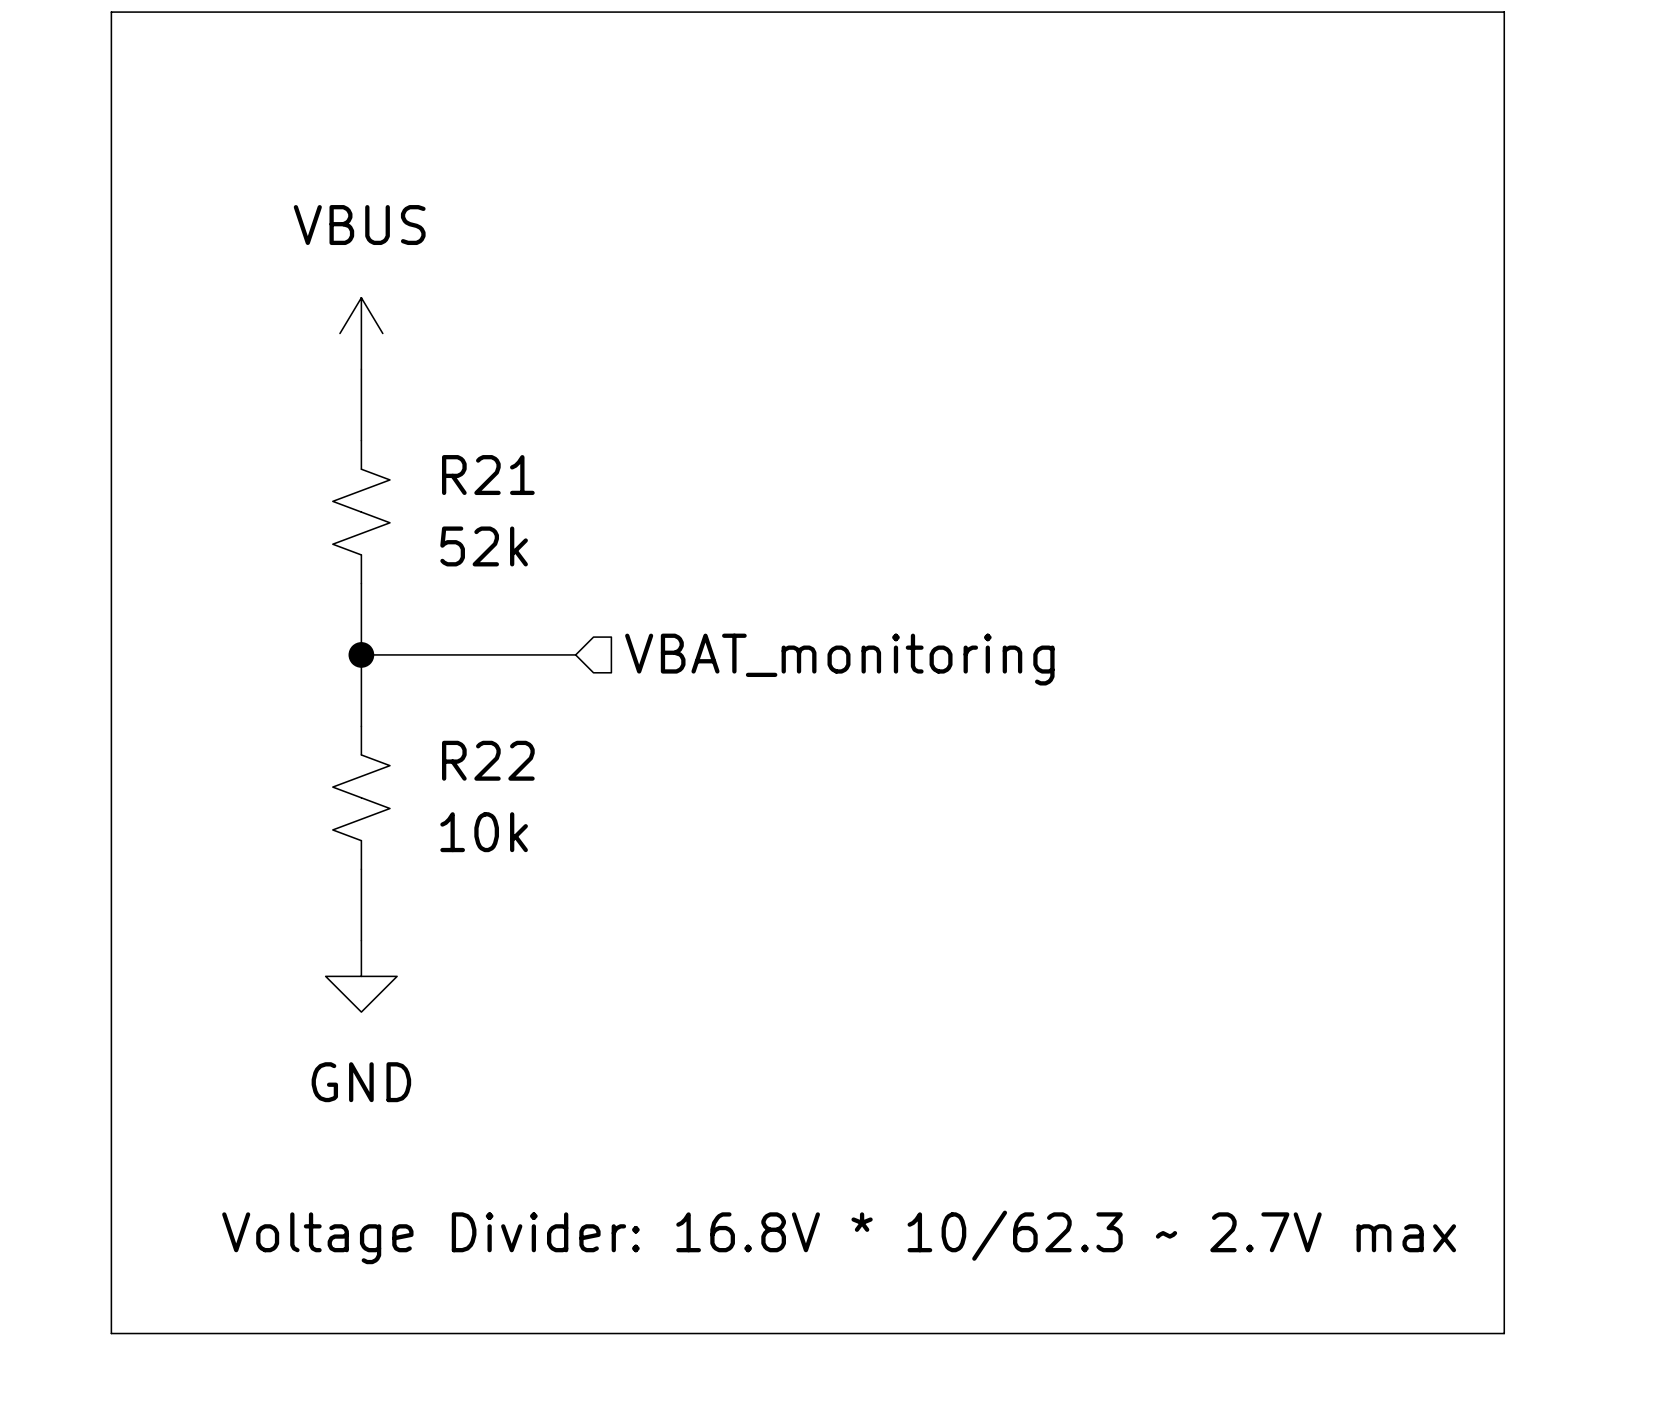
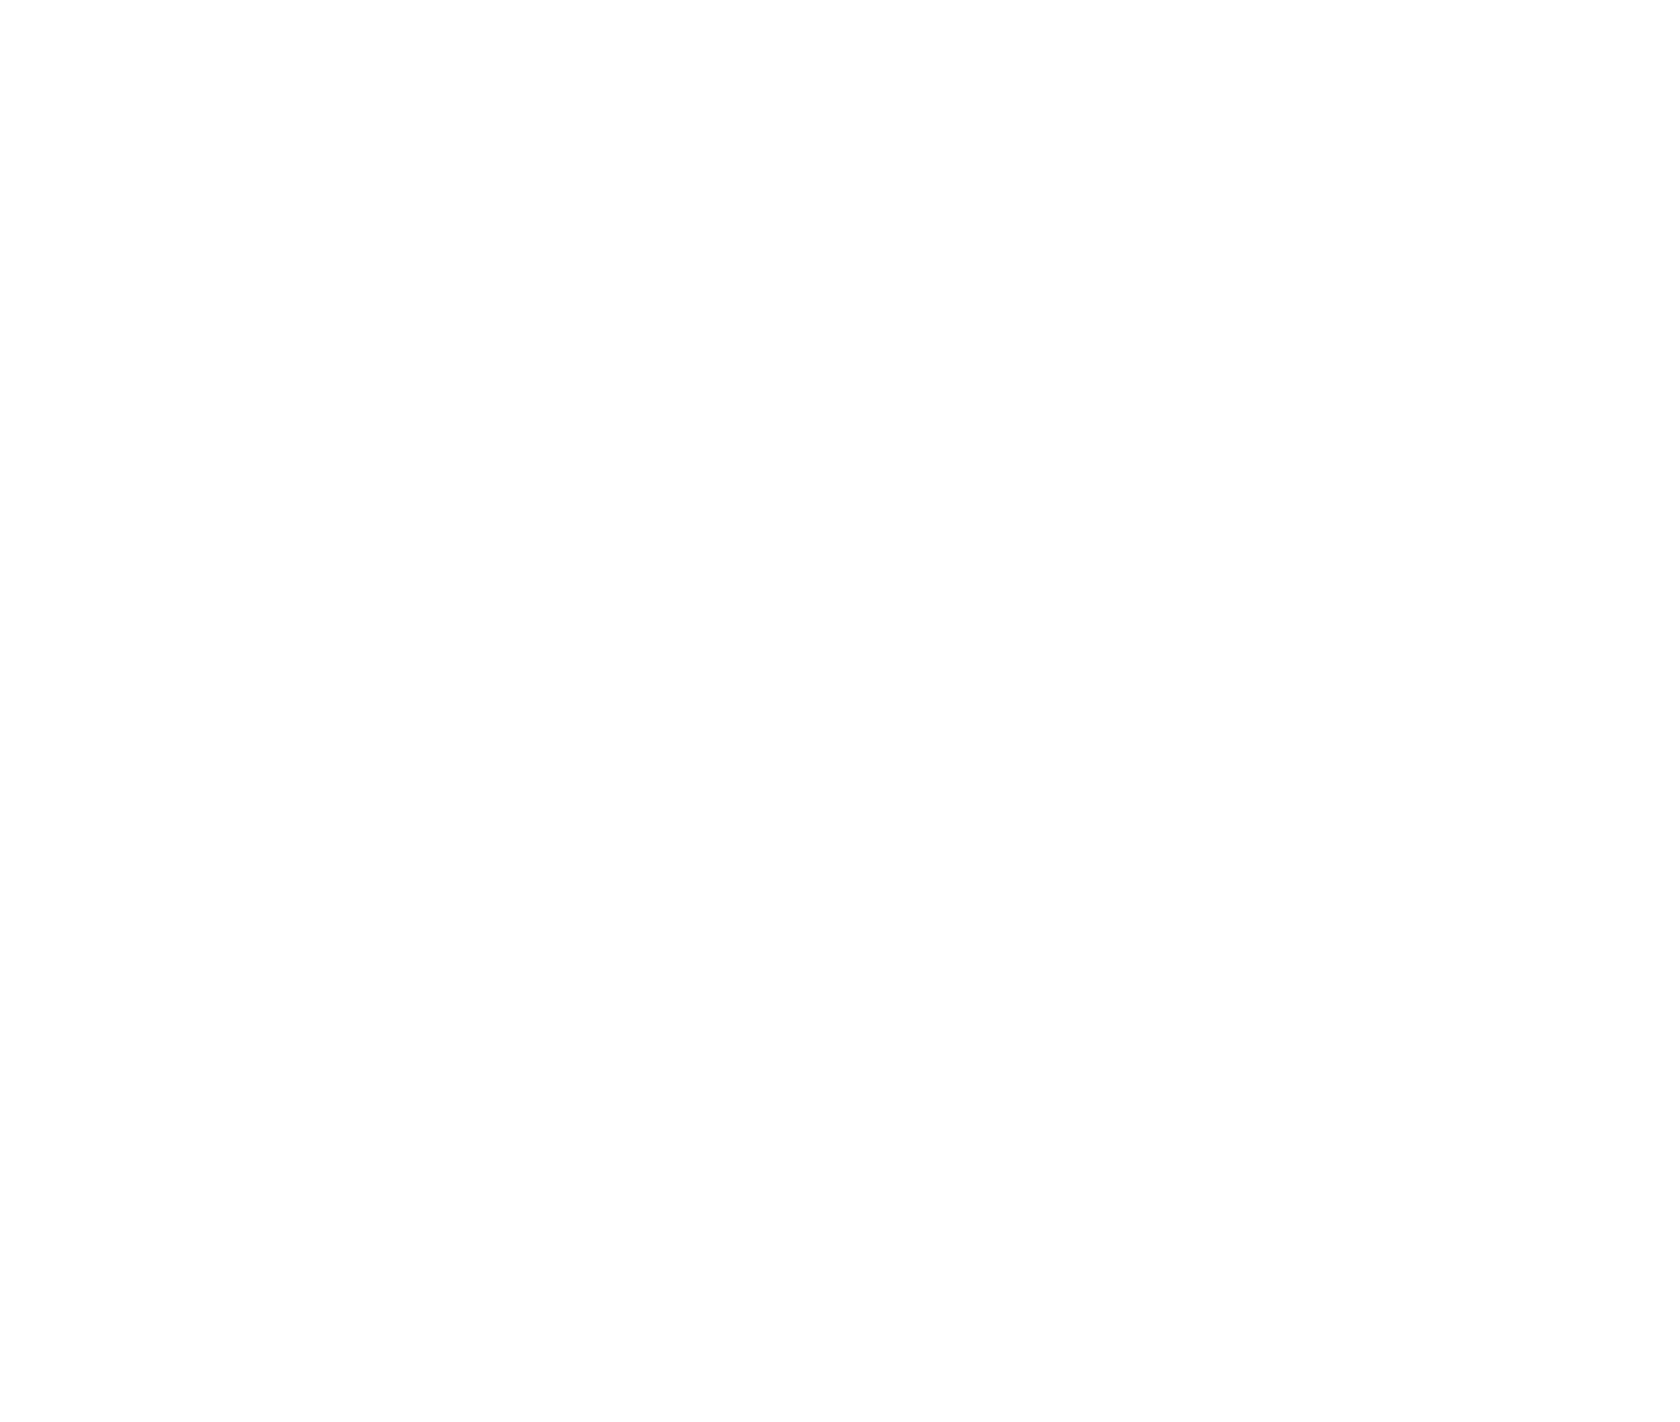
line: (111, 12) (1504, 12) (1504, 1333) (111, 1333) (111, 12) -> none
power symbol: VBUS (361, 333) -> none
wire: (361, 369) (361, 440) -> none
R21: 52k (361, 512) -> none
wire: (361, 583) (361, 726) -> none
wire: (361, 654) (575, 654) -> none
junction: (361, 654) -> none
hierarchical label: VBAT_monitoring (839, 659) -> none
R22: 10k (361, 797) -> none
wire: (361, 869) (361, 940) -> none
power symbol: GND (361, 976) -> none
text: Voltage Divider: 16.8V * 10/62.3 ~ 2.7V max (839, 1237) -> none

